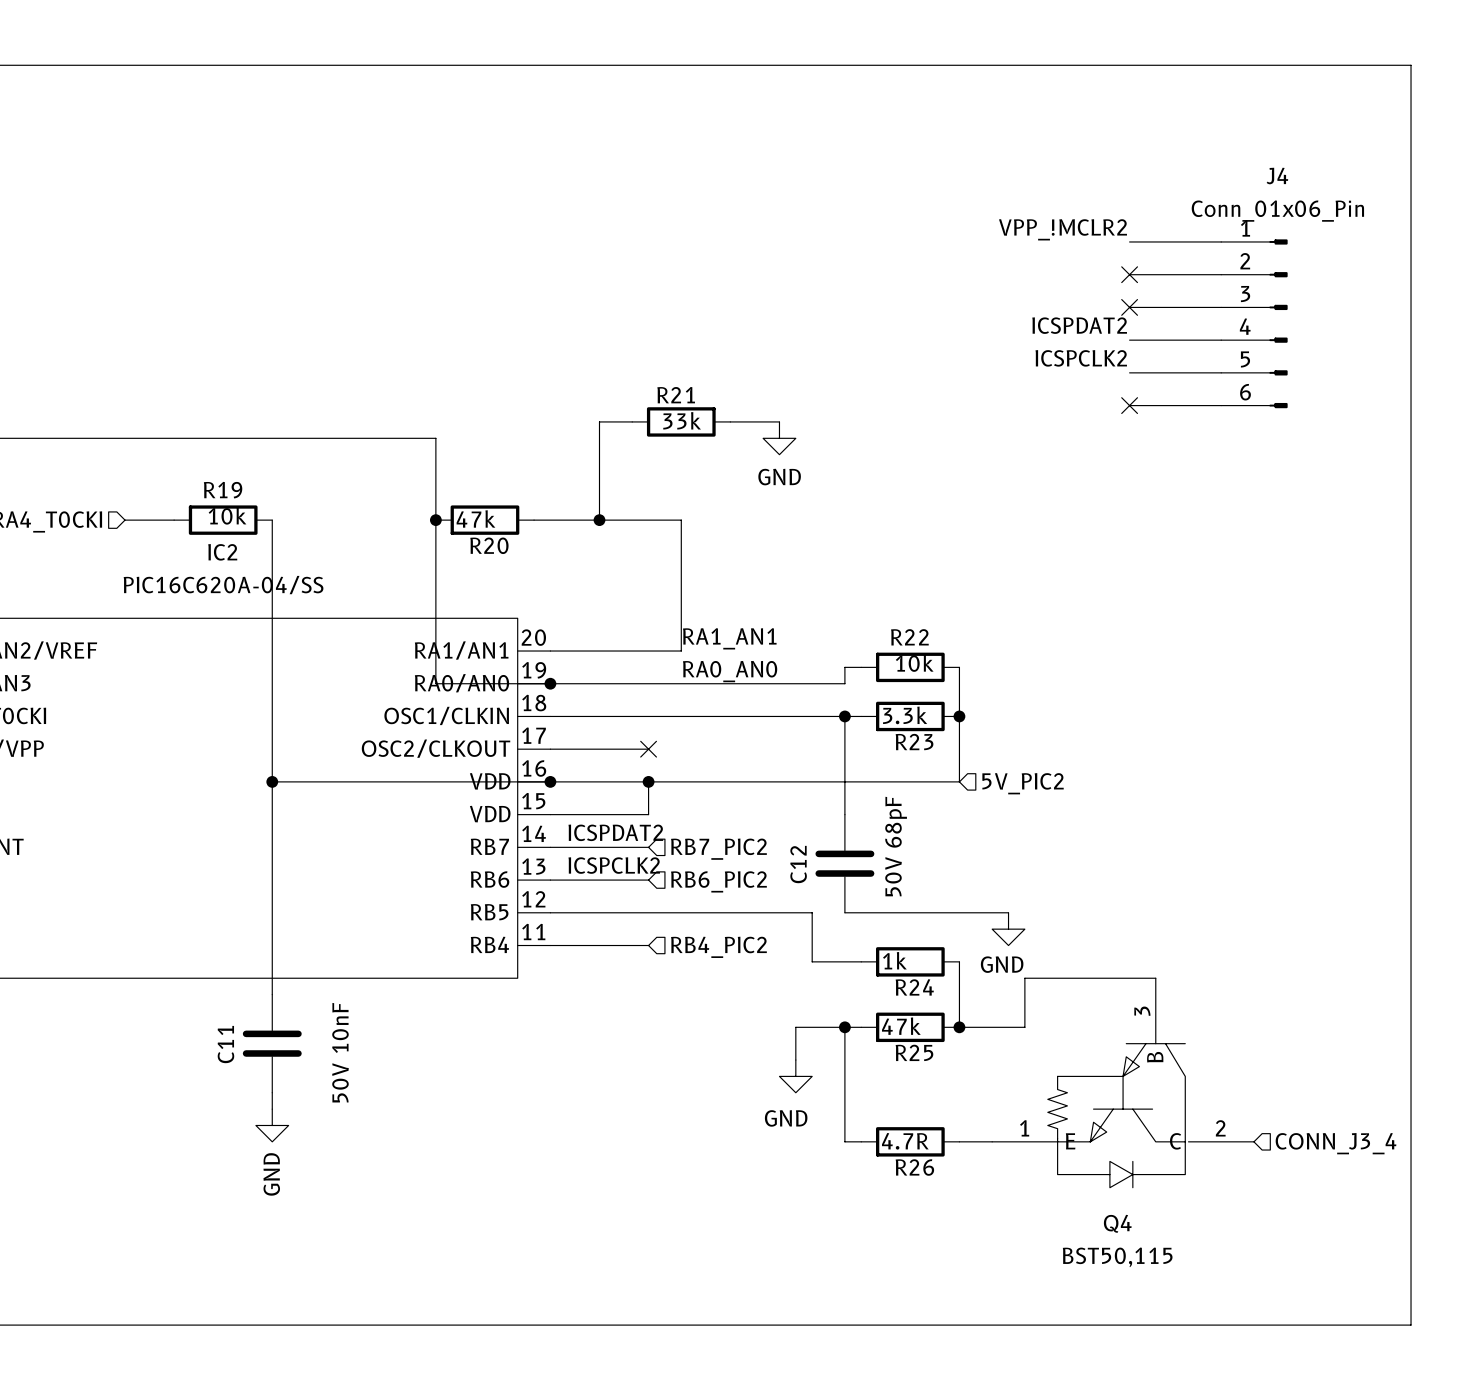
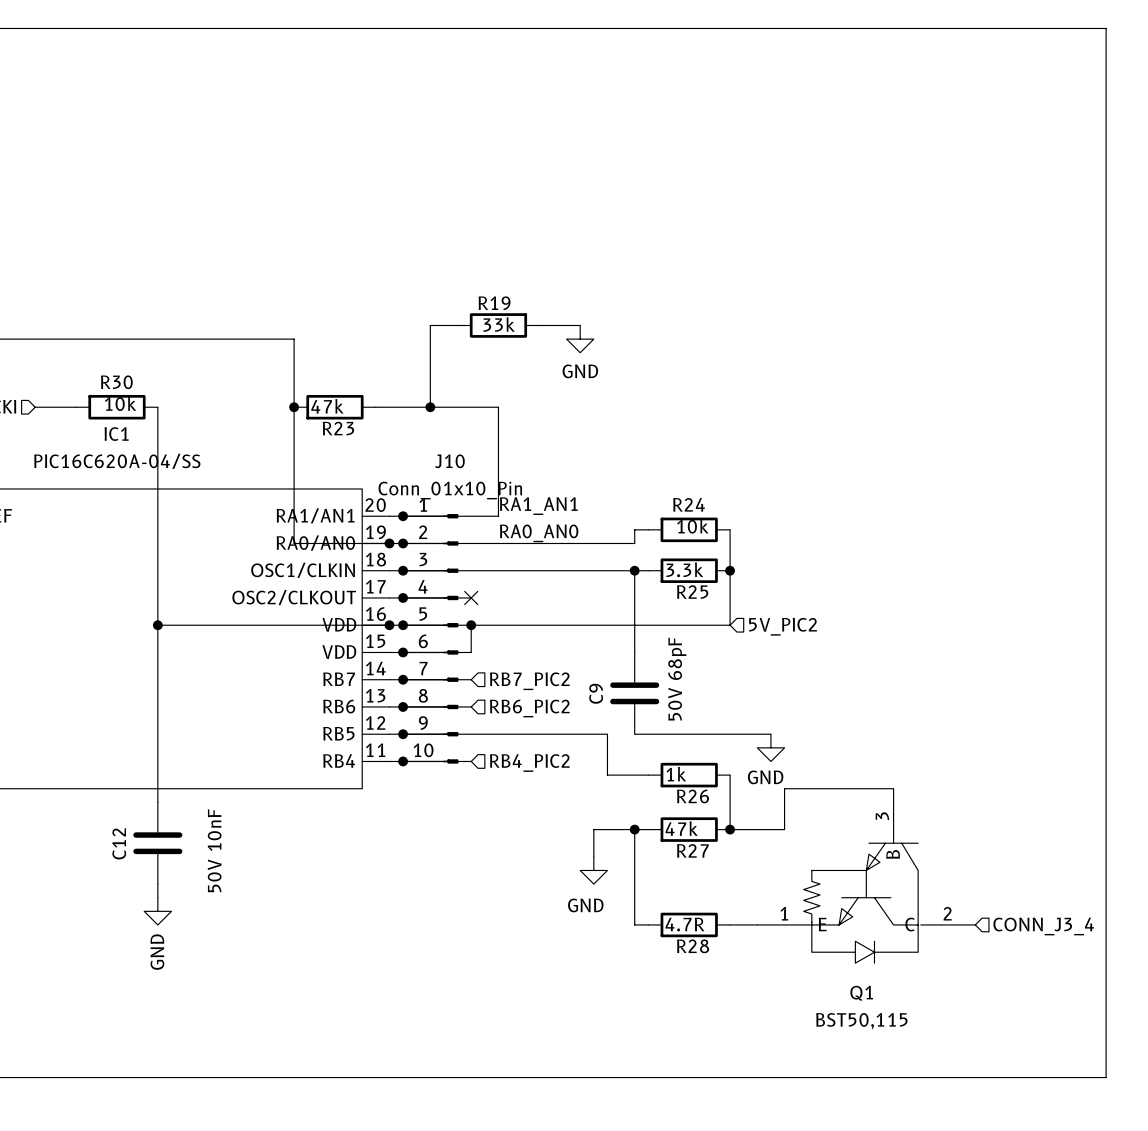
label: VPP_!MCLR2 (1062, 229) -> none
wire: (1129, 241) (1221, 241) -> none
wire: (1129, 274) (1221, 274) -> none
no-connect mark: (1129, 274) -> none
wire: (1129, 307) (1221, 307) -> none
no-connect mark: (1129, 307) -> none
J4: Conn_01x06_Pin (1254, 323) -> none
label: ICSPDAT2 (1079, 325) -> none
wire: (1129, 340) (1221, 340) -> none
label: ICSPCLK2 (1081, 358) -> none
wire: (1129, 372) (1221, 372) -> none
R21 name: R21 (676, 395) -> R19 (494, 303)
wire: (1129, 405) (1221, 405) -> none
no-connect mark: (1129, 405) -> none
R19 name: R19 (223, 490) -> R30 (116, 382)
R20 name: R20 (489, 545) -> R23 (338, 428)
IC2 name: IC2 (222, 552) -> IC1 (116, 434)
R22 name: R22 (909, 637) -> R24 (689, 504)
junction: none -> (403, 516)
junction: none -> (403, 543)
junction: none -> (403, 570)
R23 name: R23 (914, 742) -> R25 (692, 592)
junction: none -> (403, 597)
junction: none -> (403, 625)
J10: none -> Conn_01x10_Pin (430, 638)
junction: none -> (403, 652)
label: ICSPDAT2 (615, 832) -> none
junction: none -> (403, 679)
C12 name: C12 (798, 864) -> C9 (596, 693)
label: ICSPCLK2 (614, 865) -> none
junction: none -> (403, 706)
junction: none -> (403, 734)
junction: none -> (403, 761)
R24 name: R24 (914, 987) -> R26 (692, 796)
C11 name: C11 (225, 1044) -> C12 (119, 843)
R25 name: R25 (914, 1052) -> R27 (692, 850)
R26 name: R26 (914, 1167) -> R28 (693, 946)
Q4 name: Q4 (1117, 1223) -> Q1 (861, 993)

